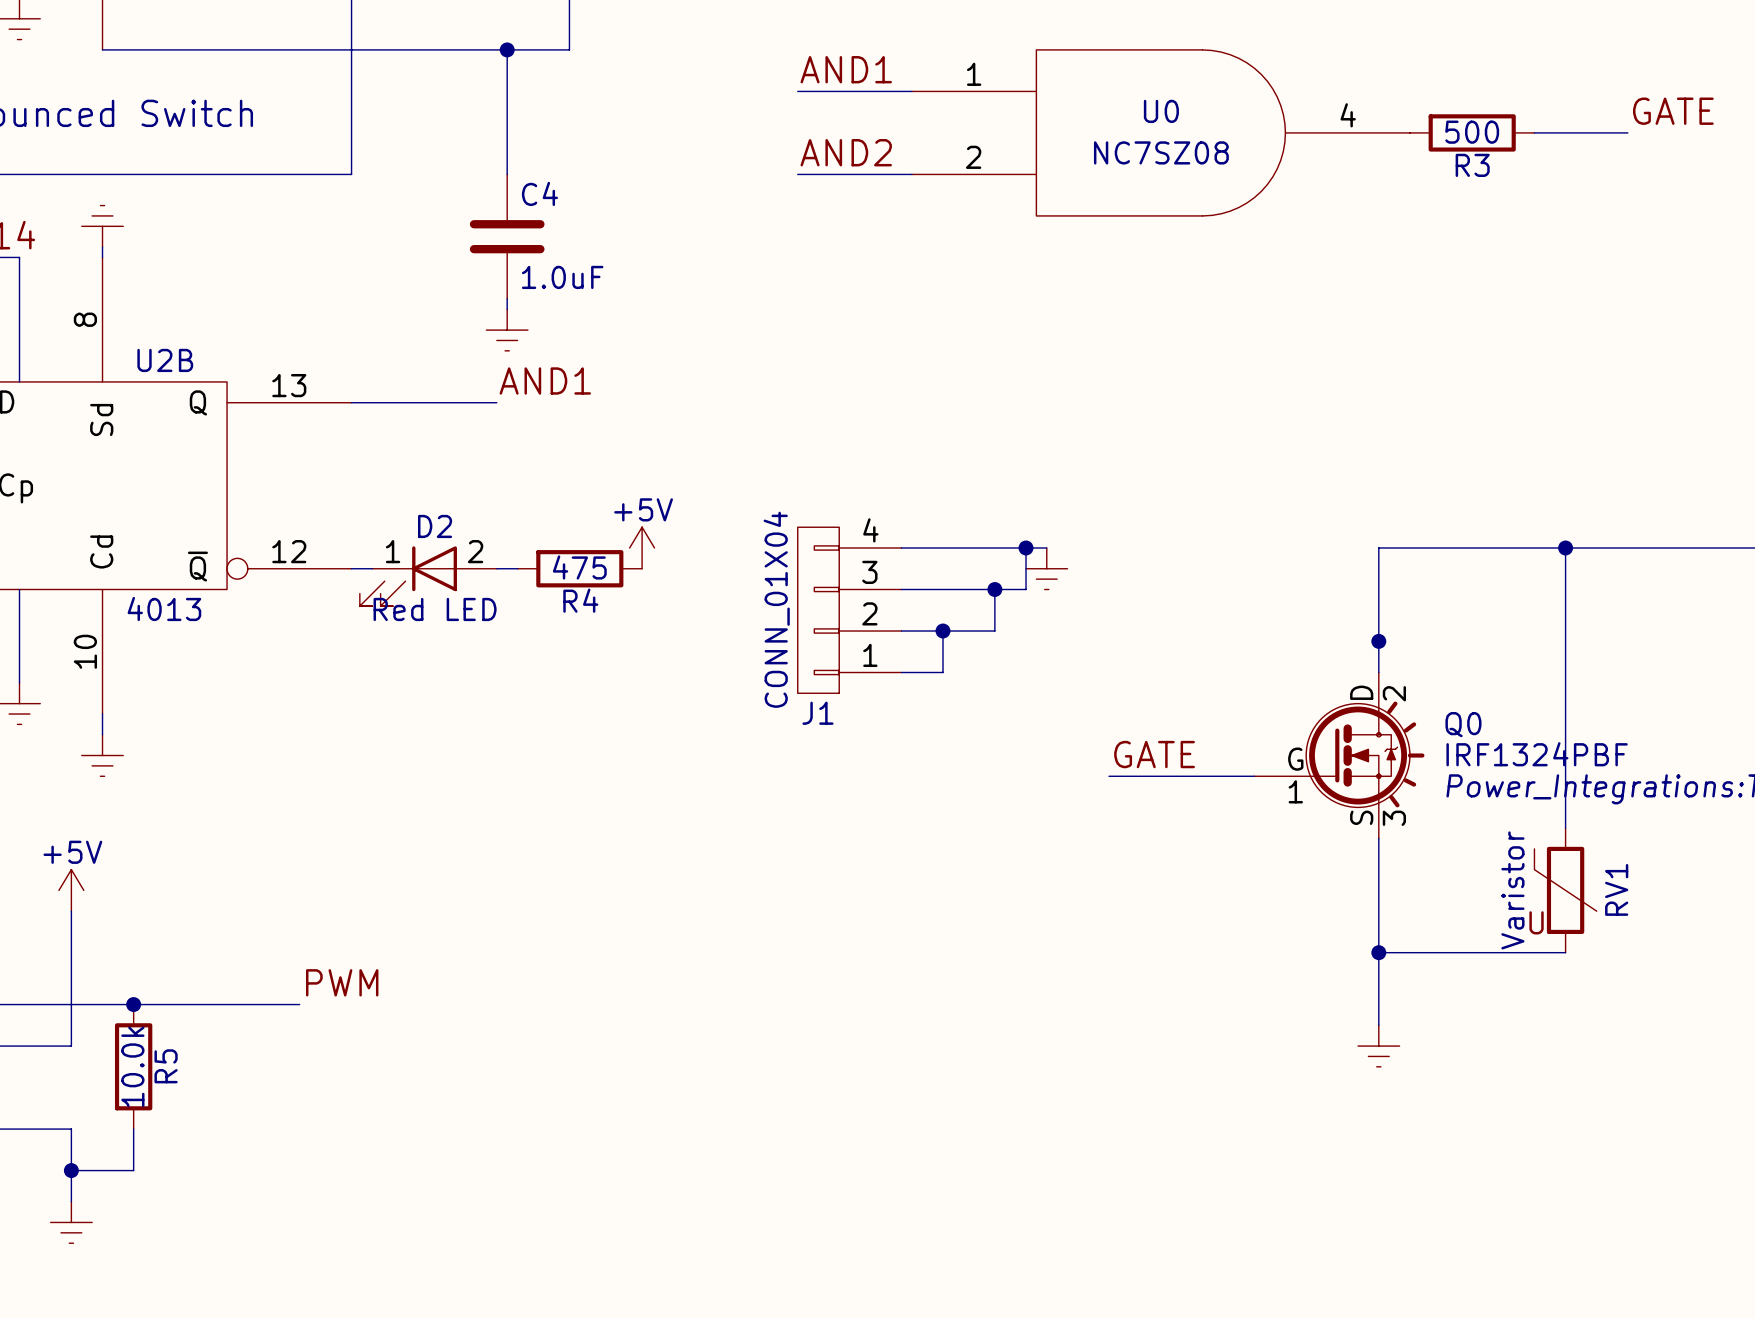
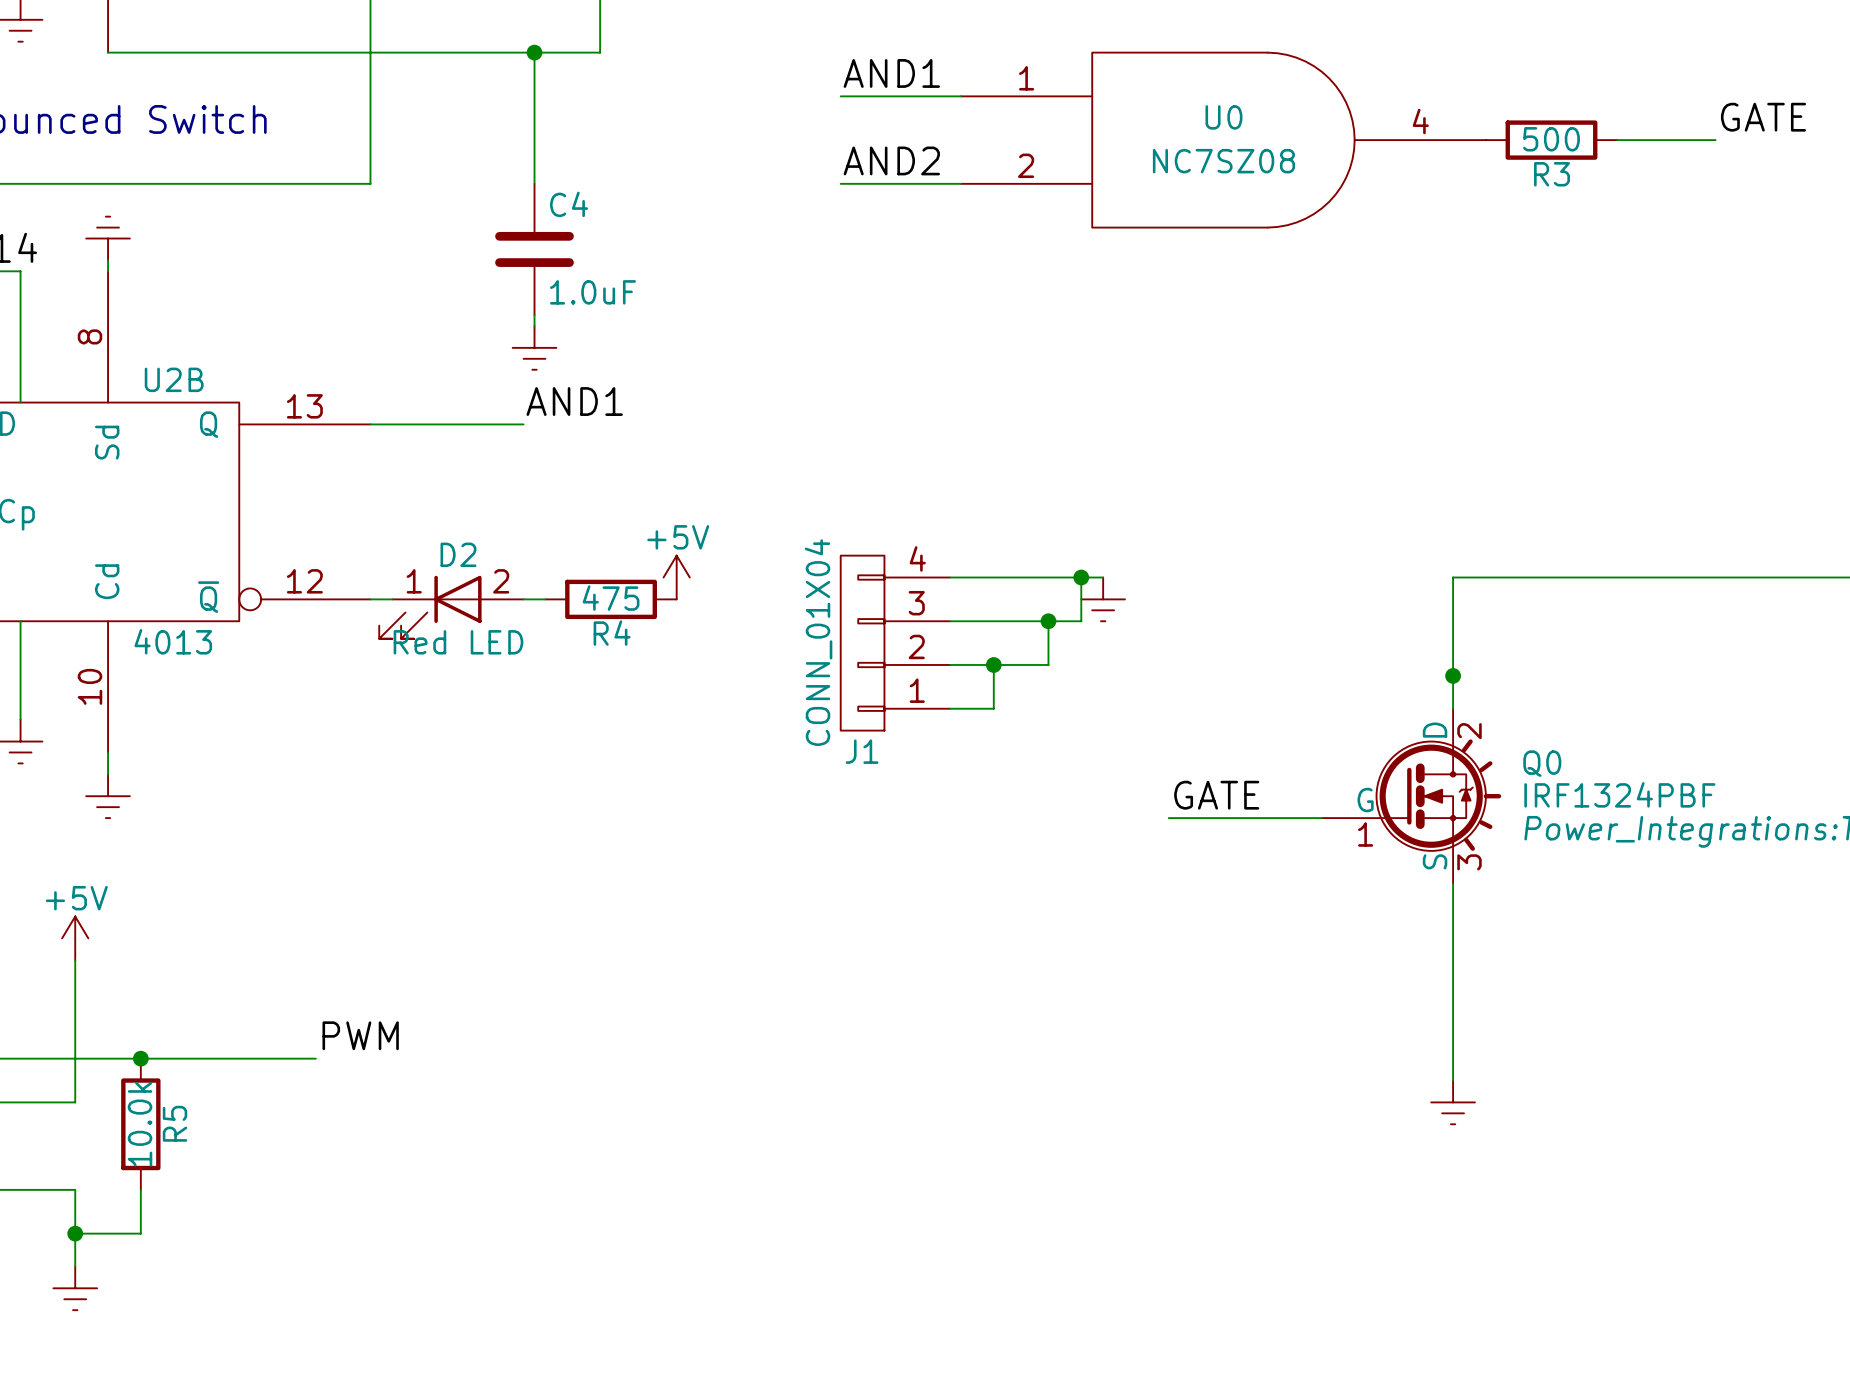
wire: (1565, 547) (1565, 828) -> none
junction: (1565, 547) -> none
RV1: Varistor (1565, 890) -> none
wire: (1378, 952) (1565, 952) -> none
junction: (1378, 952) -> none

